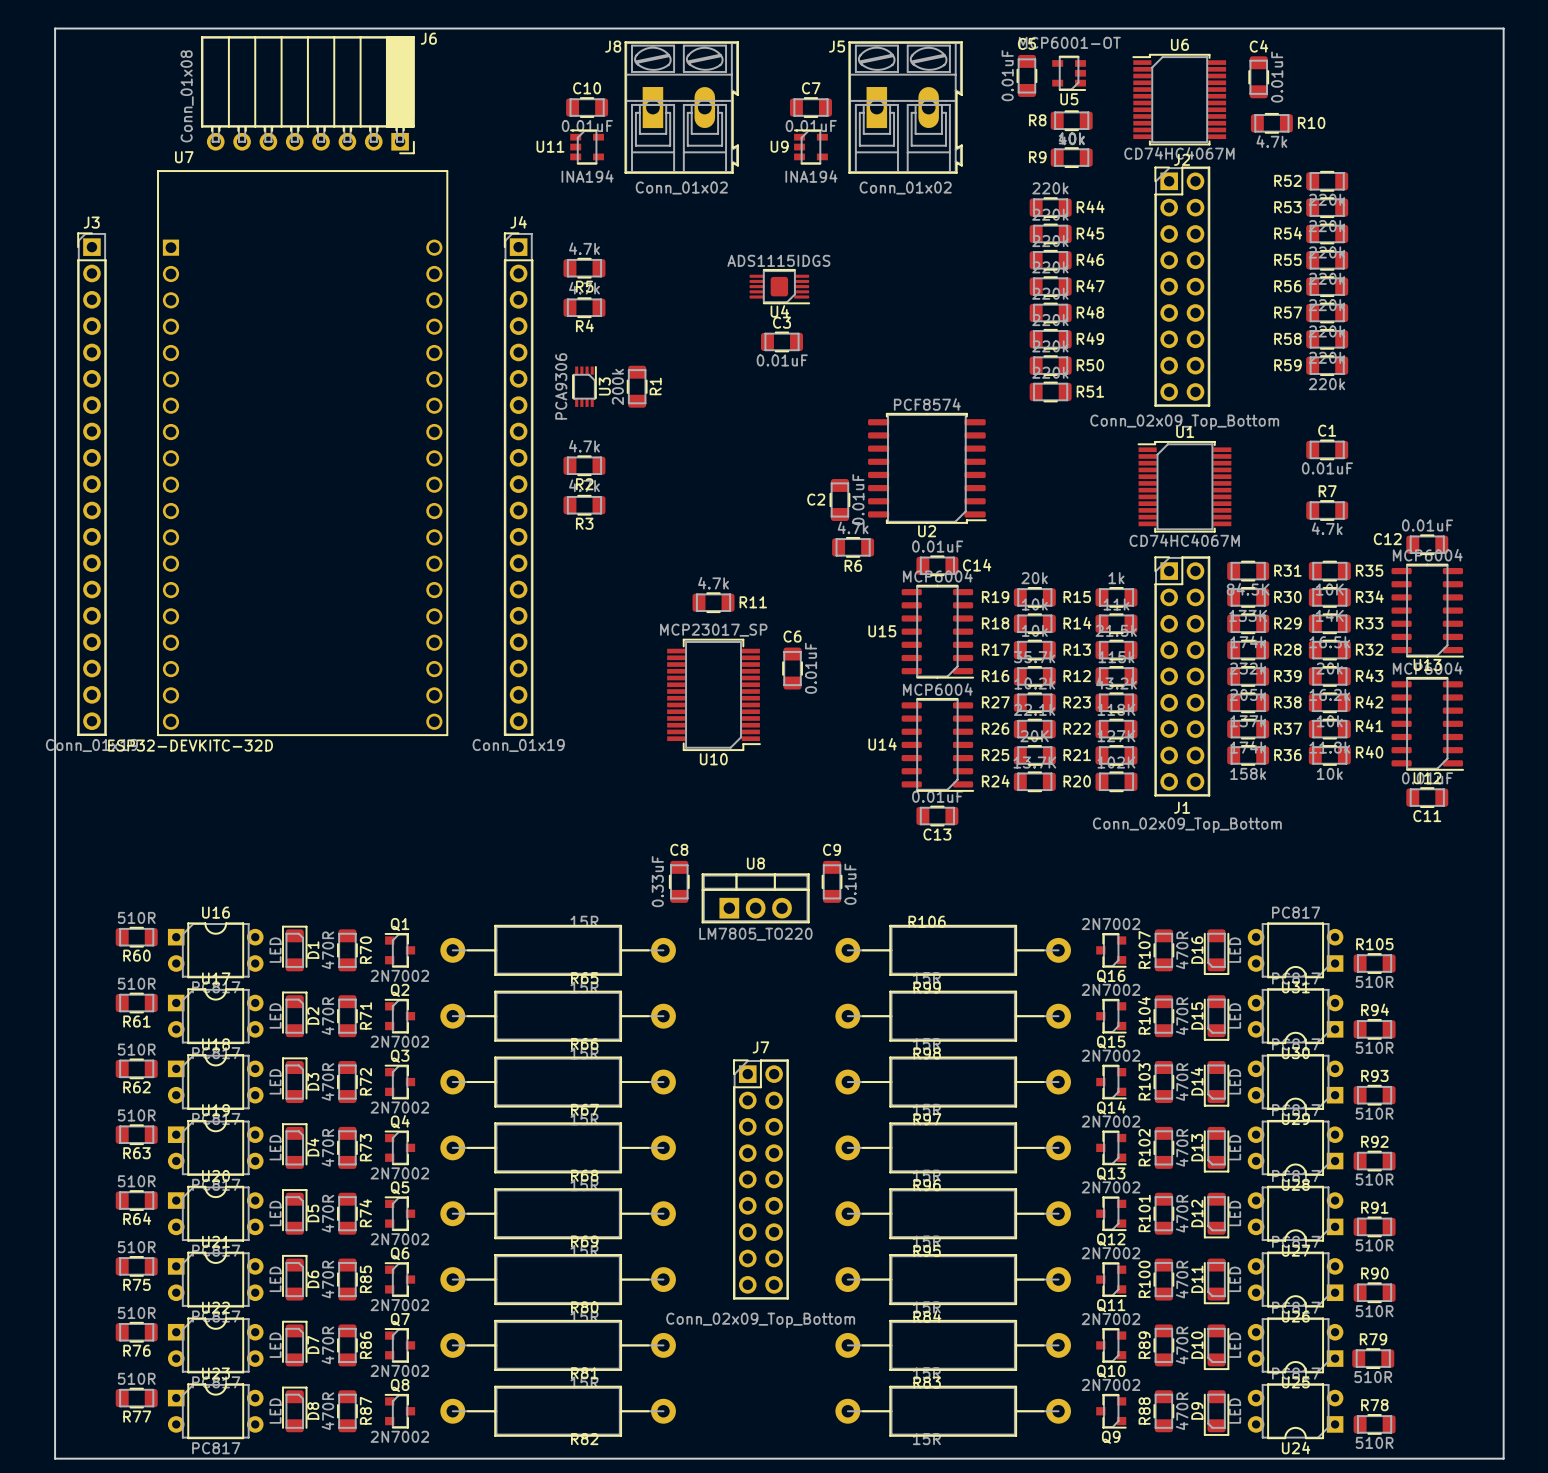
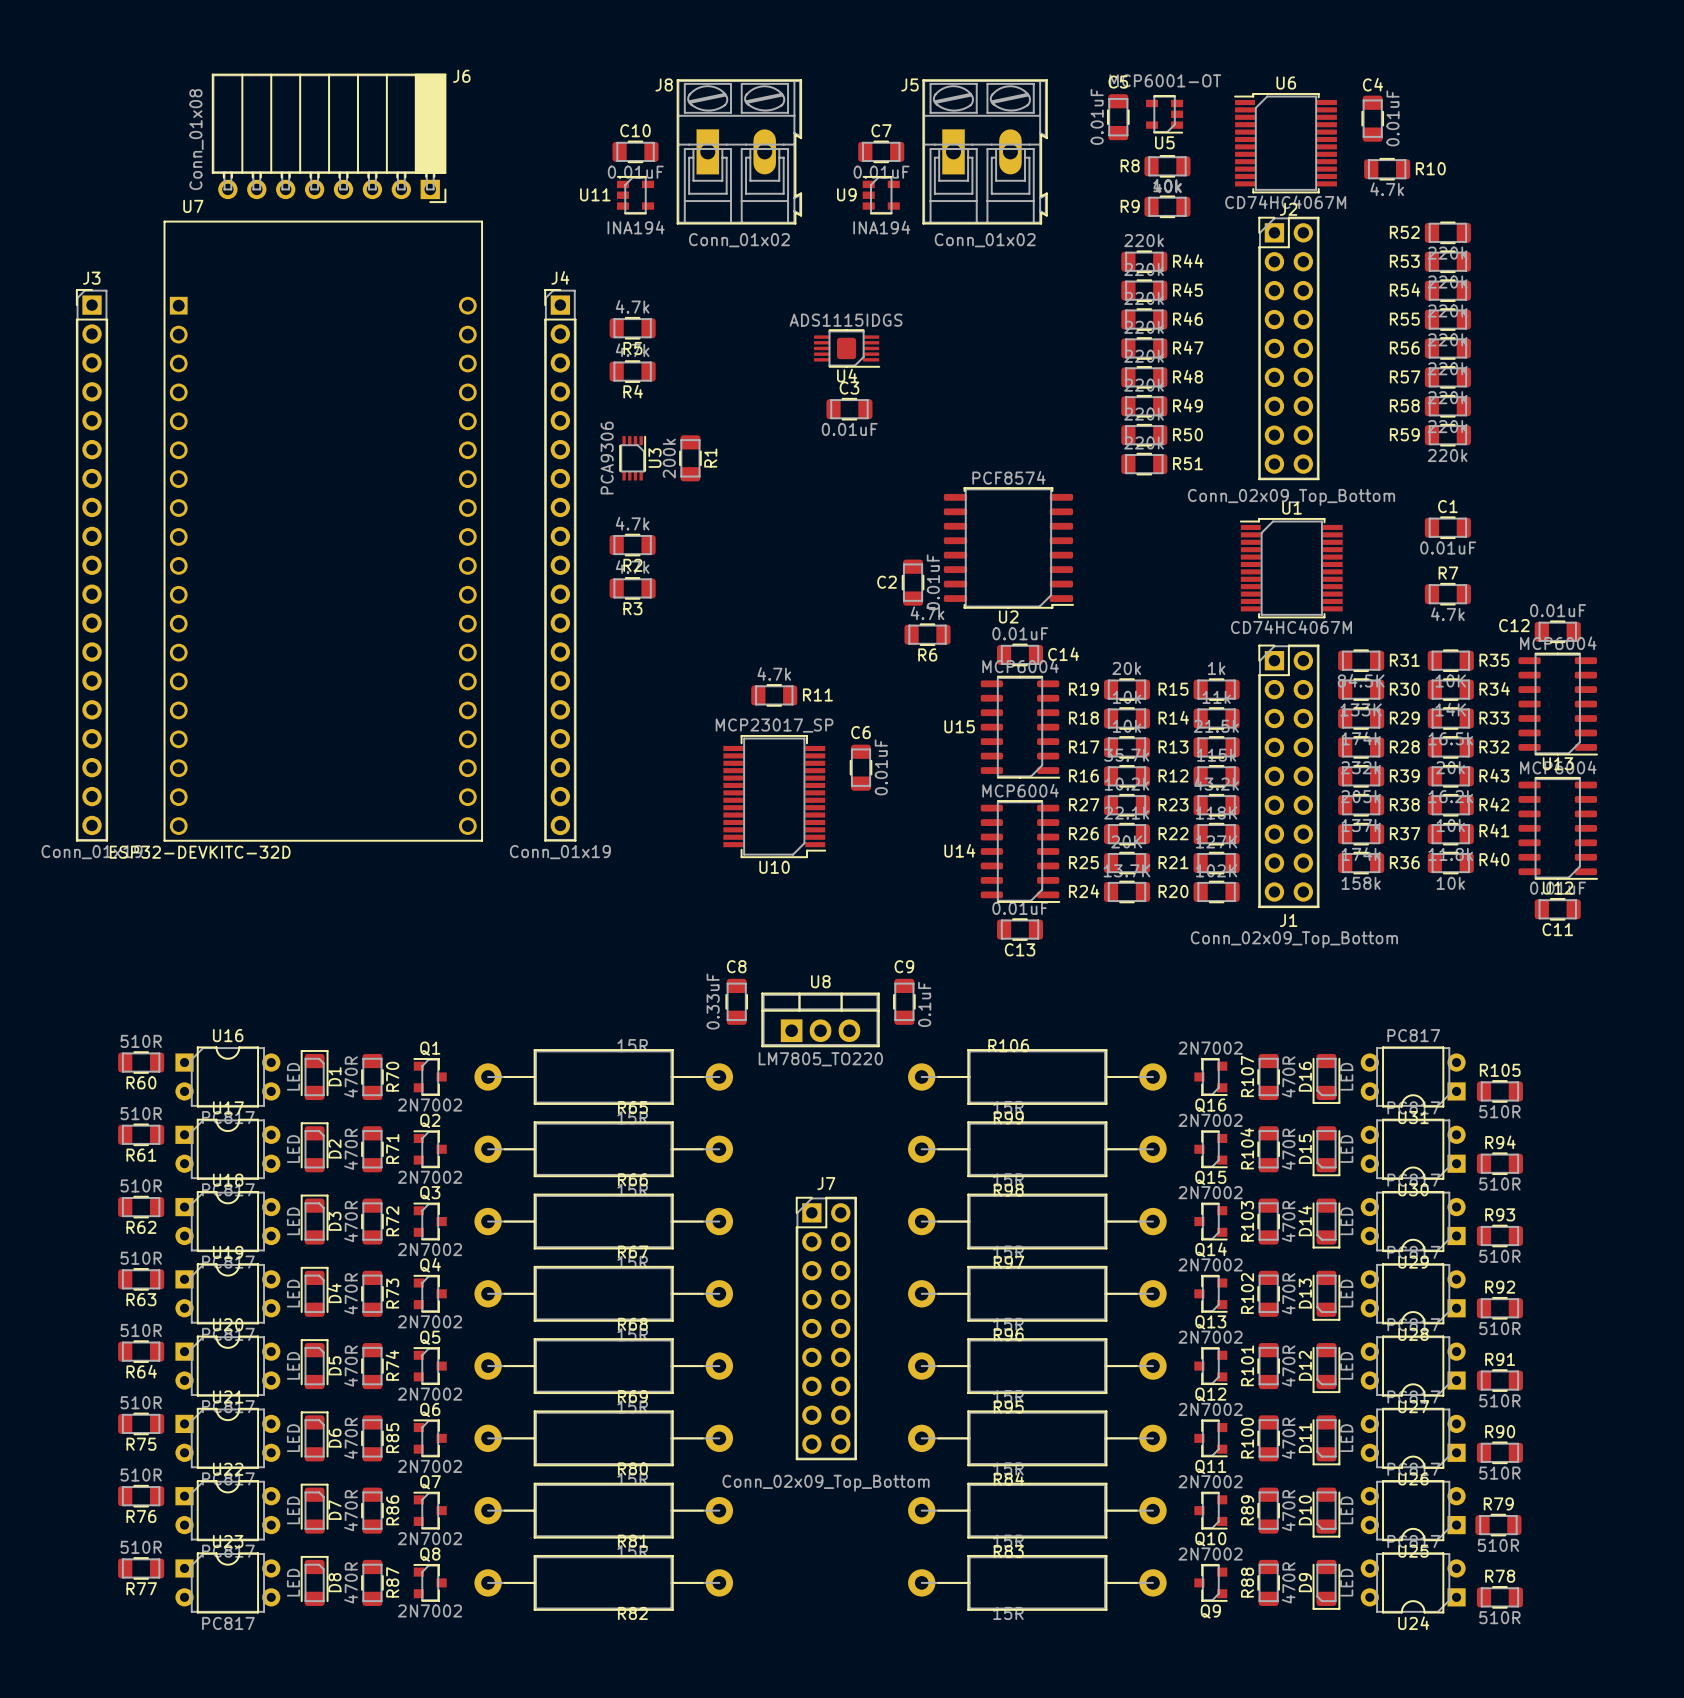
board edge: (55, 28) (55, 1458) (1503, 1458) (1503, 28) (55, 28) -> none

